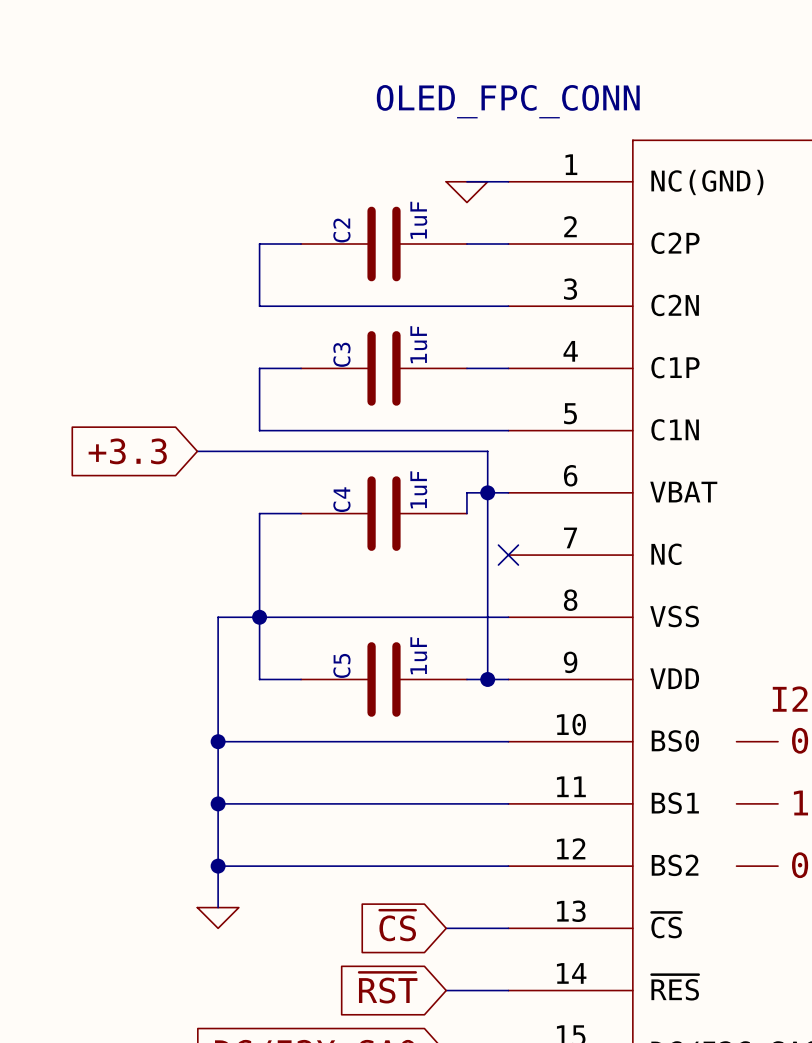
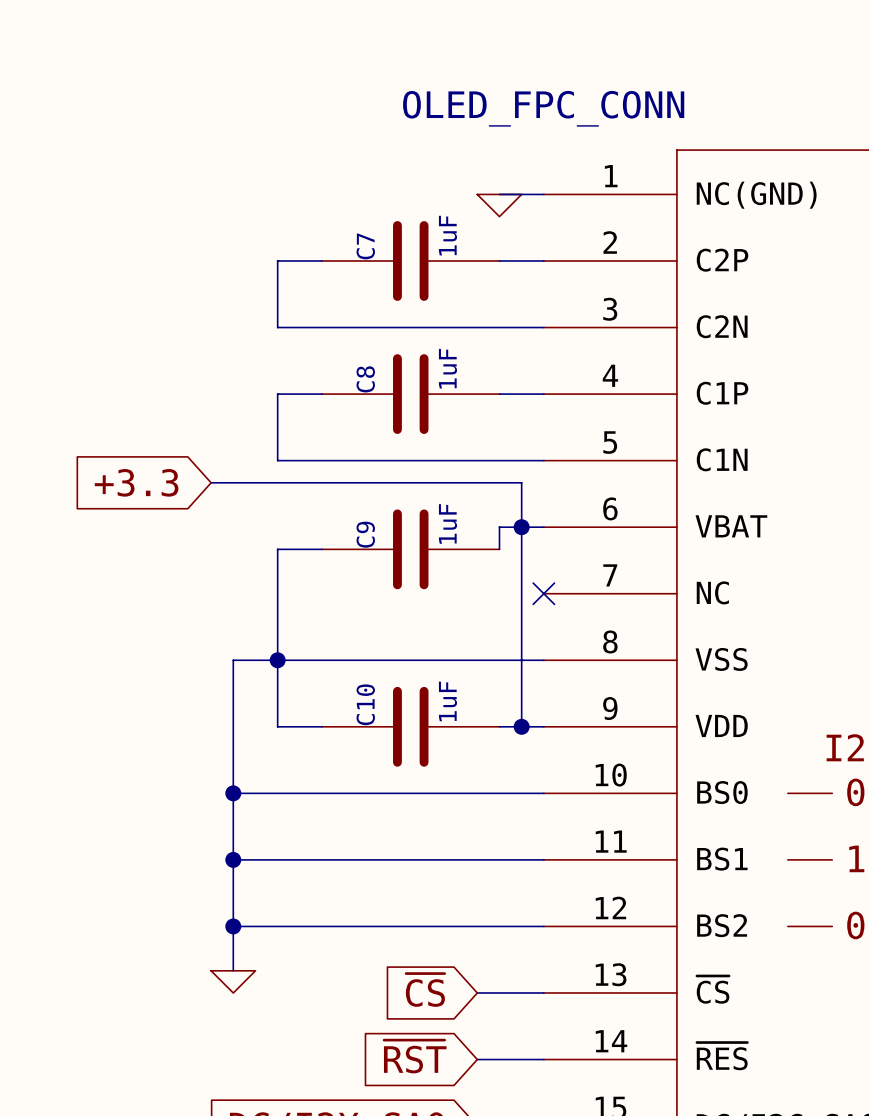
C2 name: C2 (341, 230) -> C7 (365, 246)
C3 name: C3 (341, 354) -> C8 (365, 379)
C4 name: C4 (341, 499) -> C9 (365, 534)
C5 name: C5 (341, 665) -> C10 (365, 704)

